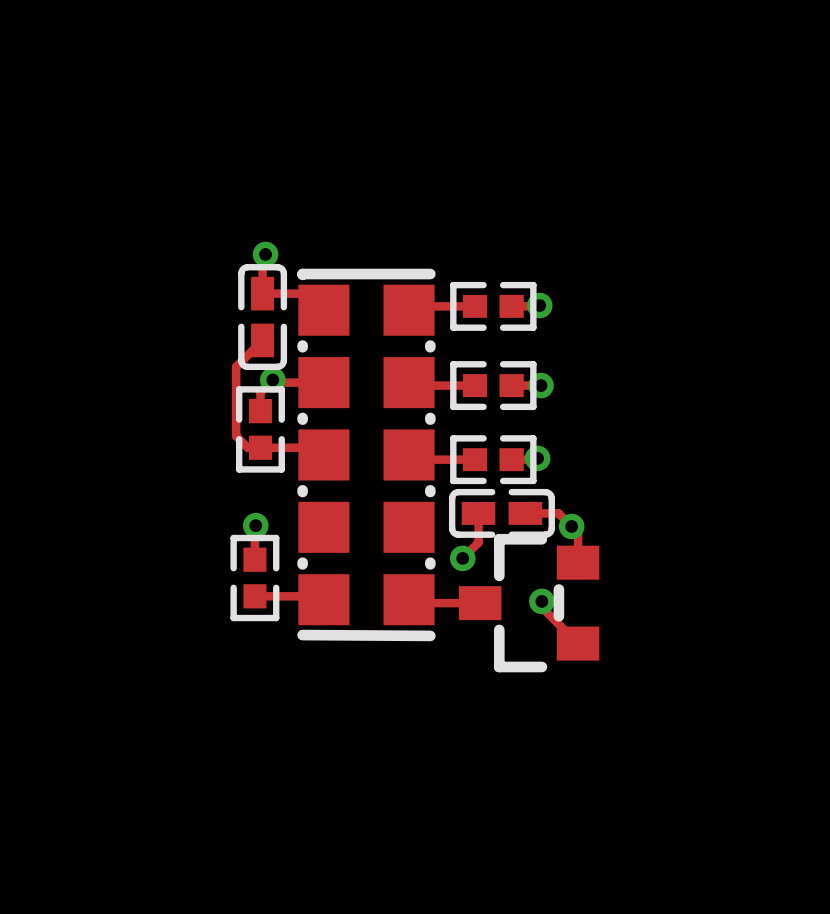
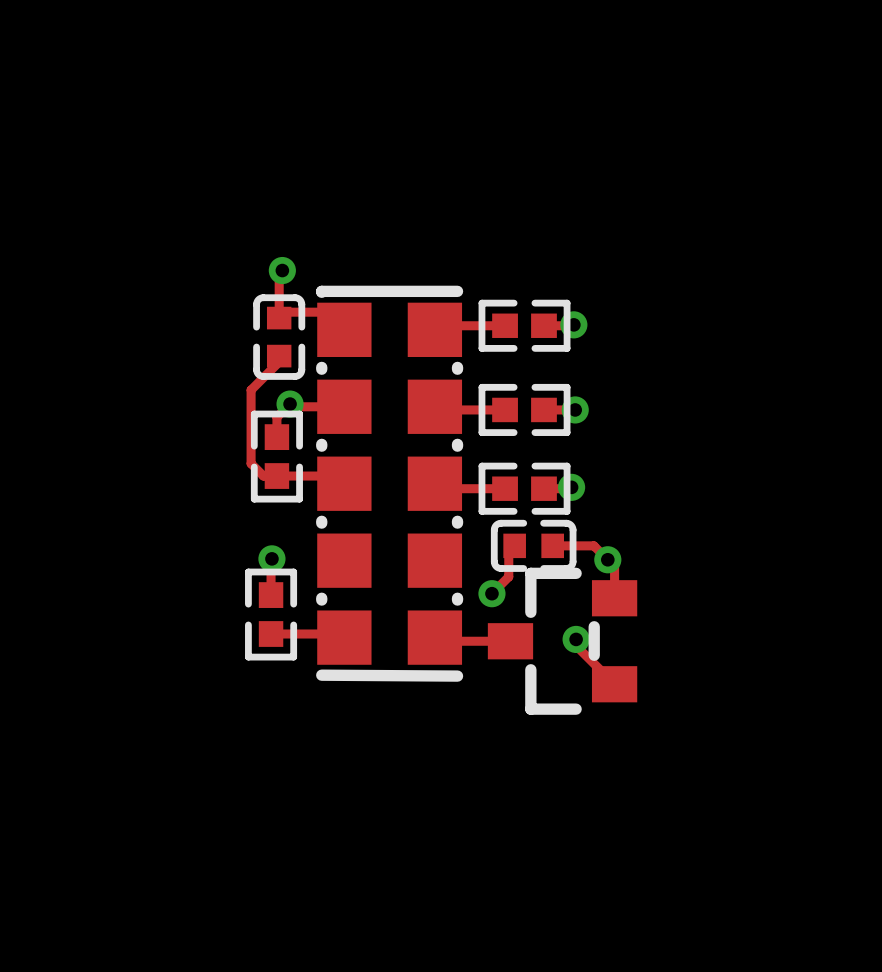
part footprint: [238, 264, 288, 371] -> [253, 294, 306, 380]
part footprint: [448, 488, 555, 538] -> [490, 519, 577, 572]

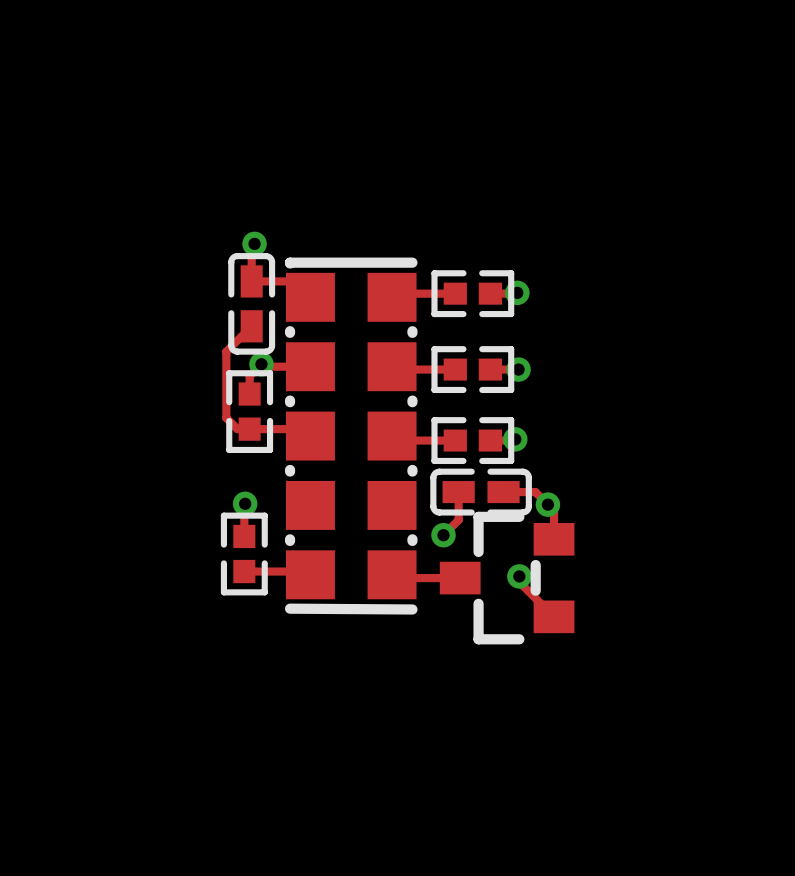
part footprint: [253, 294, 306, 380] -> [228, 253, 276, 355]
part footprint: [490, 519, 577, 572] -> [430, 468, 532, 516]

